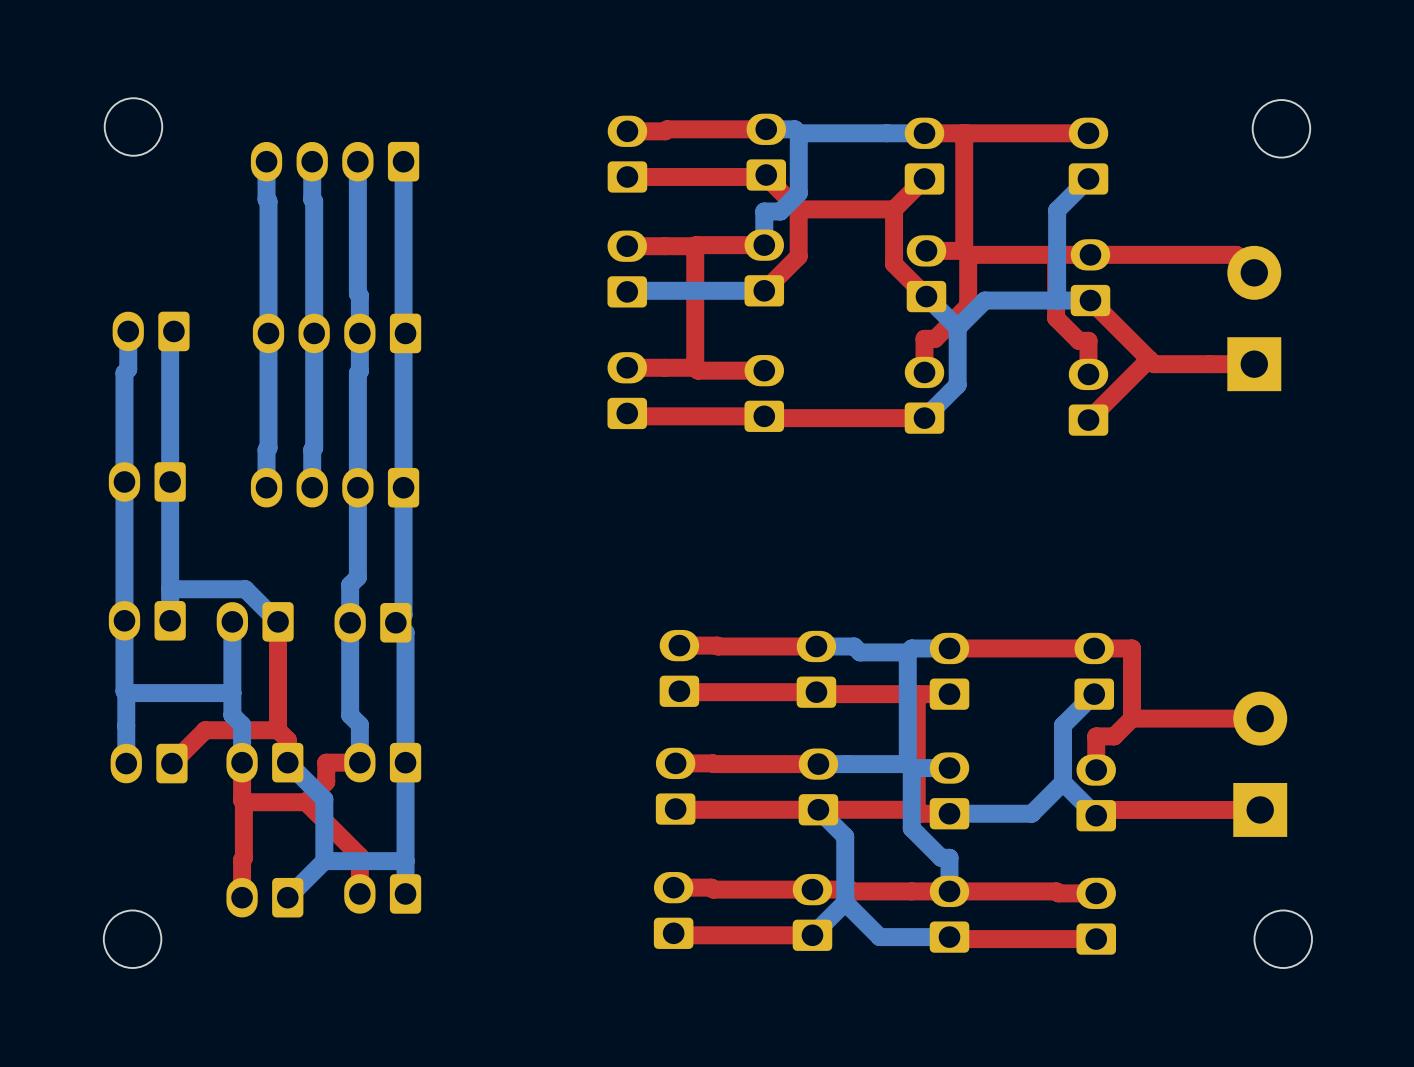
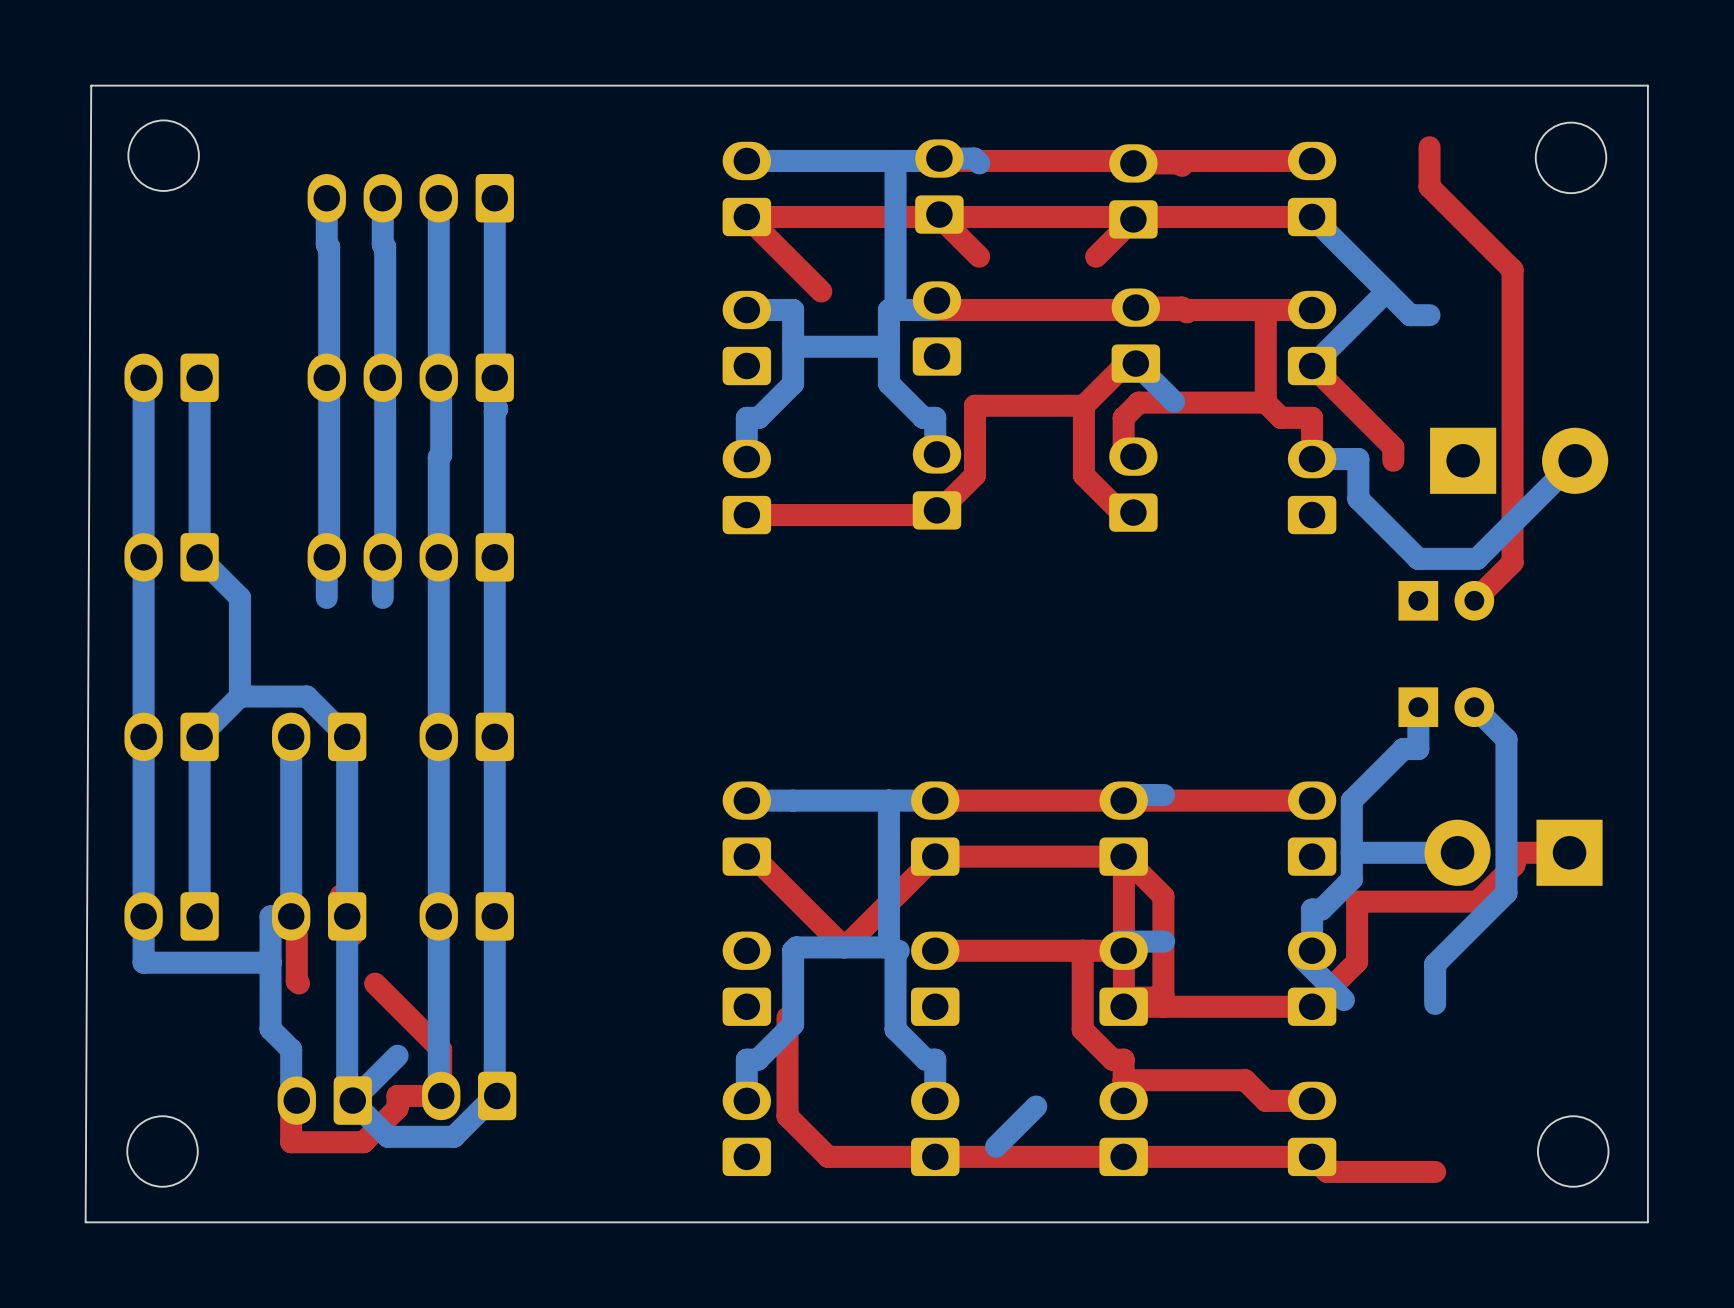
board edge: none -> (1647, 85) (1647, 1222) (85, 1222) (91, 85) (1647, 85)
top track: none -> (1429, 147) (1429, 186) (1512, 269) (1512, 562) (1474, 600)
top track: (766, 129) (627, 131) -> none
bottom track: none -> (895, 160) (895, 310)
bottom track: none -> (935, 160) (746, 160)
top track: none -> (1312, 160) (935, 160)
bottom track: (924, 133) (798, 133) (798, 193) (780, 211) (764, 211) (764, 245) -> none
top track: (1088, 133) (966, 133) (964, 135) (964, 250) -> none
part position: (627, 154) -> (746, 188)
part position: (1088, 156) -> (1312, 188)
top track: none -> (746, 216) (821, 291)
top track: none -> (1312, 216) (939, 216)
bottom track: none -> (1312, 216) (1410, 315) (1429, 315)
bottom track: (1088, 178) (1057, 210) (1057, 300) -> none
bottom track: none -> (1386, 291) (1312, 366)
top track: (764, 245) (695, 246) -> none
top track: (695, 246) (695, 367) -> none
top track: (695, 246) (627, 246) -> none
bottom track: none -> (746, 310) (793, 310) (793, 383) (758, 417) (746, 417) (746, 459)
bottom track: none -> (935, 310) (888, 310) (888, 383) (923, 417) (935, 417) (935, 459)
top track: none -> (1265, 310) (1265, 402)
top track: none -> (1312, 310) (935, 310)
top track: (1056, 254) (1056, 318) (1078, 340) (1088, 340) (1088, 374) -> none
part position: (627, 269) -> (746, 338)
top track: (1254, 272) (1236, 254) (968, 254) (968, 305) (935, 338) (924, 338) (924, 372) -> none
part position: (1090, 277) -> (1312, 338)
bottom track: none -> (888, 346) (793, 346)
top track: (764, 290) (798, 256) (798, 209) (894, 209) (894, 264) (926, 296) -> none
bottom track: (764, 290) (627, 291) -> none
top track: none -> (1123, 366) (1083, 405)
top track: none -> (1312, 366) (1393, 447) (1393, 460)
top track: (1090, 300) (1154, 364) (1254, 364) -> none
bottom track: (1090, 300) (984, 300) (957, 327) (957, 384) (924, 418) -> none
bottom track: none -> (143, 377) (143, 962) (270, 962)
bottom track: none -> (199, 377) (199, 557) (239, 597) (239, 696)
part rotation: 0° (1254, 318) -> 90° clockwise (1519, 460)
top track: none -> (1265, 402) (1138, 402) (1123, 417) (1123, 459)
top track: none -> (1265, 402) (1280, 417) (1312, 417) (1312, 459)
top track: none -> (1083, 405) (1083, 475) (1123, 515)
top track: none -> (1083, 405) (974, 405) (974, 475) (935, 515) (746, 515)
bottom track: (128, 331) (128, 369) (124, 372) (124, 691) (126, 693) -> none
part position: (151, 331) -> (171, 377)
bottom track: (173, 331) (170, 335) (170, 620) -> none
part position: (337, 333) -> (410, 377)
top track: (1149, 359) (1088, 420) -> none
top track: (695, 367) (627, 367) -> none
top track: (695, 367) (698, 370) (764, 370) -> none
bottom track: none -> (1312, 459) (1358, 459) (1358, 498) (1418, 558) (1477, 558) (1575, 460)
part position: (627, 390) -> (746, 487)
part position: (1088, 397) -> (1312, 487)
top track: (627, 413) (630, 416) (924, 418) -> none
part position: (147, 481) -> (171, 557)
part position: (335, 487) -> (410, 557)
part: none -> (1446, 600)
bottom track: none -> (239, 696) (199, 736) (199, 916)
bottom track: none -> (1418, 707) (1418, 749) (1403, 749) (1351, 800) (1351, 879) (1321, 909) (1312, 909) (1312, 950)
part: none -> (1446, 707)
bottom track: none -> (1474, 707) (1506, 739) (1506, 892) (1435, 964) (1435, 1003)
bottom track: (357, 577) (350, 585) (350, 715) (359, 724) (359, 762) -> (438, 707) (438, 1095)
bottom track: (170, 589) (245, 589) (278, 621) -> none
bottom track: none -> (291, 736) (291, 916) (270, 916) (270, 1029) (291, 1049) (291, 1095)
bottom track: (403, 615) (395, 622) (405, 632) (405, 893) -> (494, 754) (494, 1095) (453, 1136) (388, 1136) (347, 1095) (347, 736) (306, 696) (239, 696)
part position: (147, 620) -> (171, 736)
bottom track: (232, 621) (232, 715) (242, 724) (242, 762) -> none
part position: (255, 621) -> (319, 736)
top track: (278, 621) (278, 730) (205, 730) (171, 763) -> none
part position: (372, 622) -> (466, 736)
top track: (679, 645) (816, 646) -> none
bottom track: (816, 646) (854, 646) (860, 652) (907, 652) (907, 764) -> none
top track: (949, 648) (1132, 648) (1132, 718) -> none
bottom track: none -> (888, 800) (888, 947) (796, 947) (793, 950) (793, 1024) (757, 1059) (746, 1059) (746, 1100)
bottom track: none -> (935, 800) (746, 800)
top track: none -> (1312, 800) (935, 800)
part: (679, 668) -> none
part: (816, 669) -> none
part position: (949, 671) -> (1123, 828)
part position: (1094, 671) -> (1312, 828)
part: none -> (746, 828)
part: none -> (935, 828)
top track: (679, 691) (949, 694) -> none
bottom track: (126, 693) (126, 763) -> none
bottom track: (232, 693) (126, 693) -> none
bottom track: (1094, 694) (1063, 725) (1063, 782) (1031, 813) (949, 813) -> none
bottom track: none -> (1457, 852) (1351, 852)
top track: none -> (1569, 852) (1514, 852) (1514, 865) (1477, 901) (1357, 901) (1357, 961) (1312, 1006) (1123, 1006)
top track: none -> (746, 856) (753, 856) (844, 947) (935, 856) (1123, 856) (1163, 896) (1163, 1006)
top track: (1132, 718) (1114, 736) (1096, 736) (1096, 770) -> none
top track: (1260, 718) (1132, 718) -> none
part position: (264, 762) -> (319, 916)
bottom track: (287, 762) (324, 799) (324, 861) (405, 861) -> none
top track: (359, 762) (326, 762) (326, 781) (305, 802) (243, 802) (242, 897) -> none
part position: (382, 762) -> (466, 916)
part position: (149, 763) -> (171, 916)
top track: (675, 763) (818, 764) -> none
bottom track: (907, 764) (911, 768) (911, 828) (941, 857) (949, 857) (949, 891) -> none
bottom track: (907, 764) (818, 764) -> none
part rotation: 0° (1260, 764) -> 90° counterclockwise (1513, 852)
bottom track: none -> (898, 950) (895, 954) (895, 1029) (925, 1059) (935, 1059) (935, 1100)
top track: none -> (1082, 950) (1082, 1029) (1112, 1059) (1123, 1059) (1123, 1100)
top track: none -> (1123, 950) (935, 950)
part: (675, 786) -> none
part: (818, 786) -> none
part position: (949, 790) -> (1123, 978)
part position: (1096, 792) -> (1312, 978)
part: none -> (746, 978)
part: none -> (935, 978)
top track: (675, 809) (916, 809) -> none
bottom track: (818, 809) (845, 836) (845, 902) (879, 937) (949, 937) -> none
top track: (1260, 809) (1101, 809) (1096, 815) -> none
top track: none -> (787, 1017) (787, 1116) (828, 1156) (1312, 1156) (1327, 1171) (1435, 1171)
top track: none -> (1123, 1080) (1245, 1080) (1265, 1100) (1312, 1100)
top track: (673, 887) (1096, 893) -> none
top track: none -> (438, 1095) (397, 1095) (397, 1108) (363, 1142) (291, 1142) (291, 1095)
part: (673, 910) -> none
part: (812, 912) -> none
part position: (949, 914) -> (1123, 1128)
part position: (1096, 916) -> (1312, 1128)
part: none -> (746, 1128)
part: none -> (935, 1128)
top track: (673, 933) (675, 935) (812, 935) -> none
top track: (949, 937) (951, 939) (1096, 939) -> none

